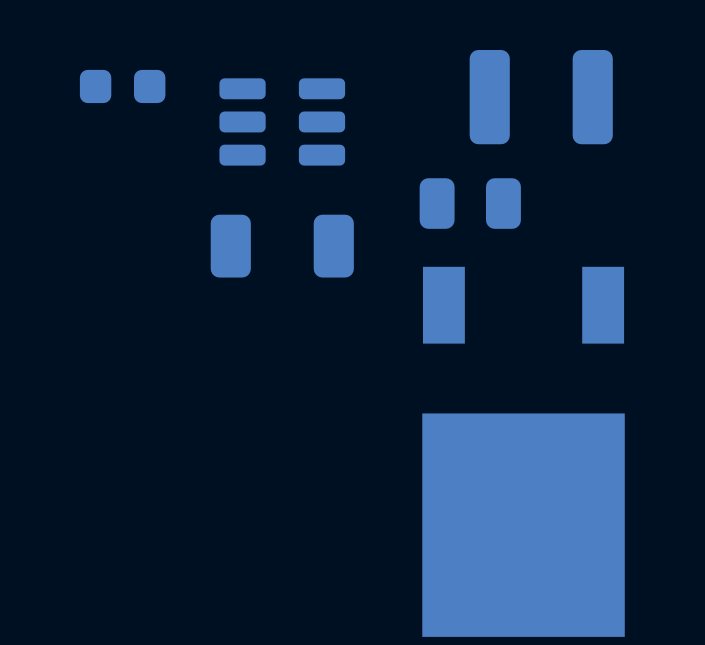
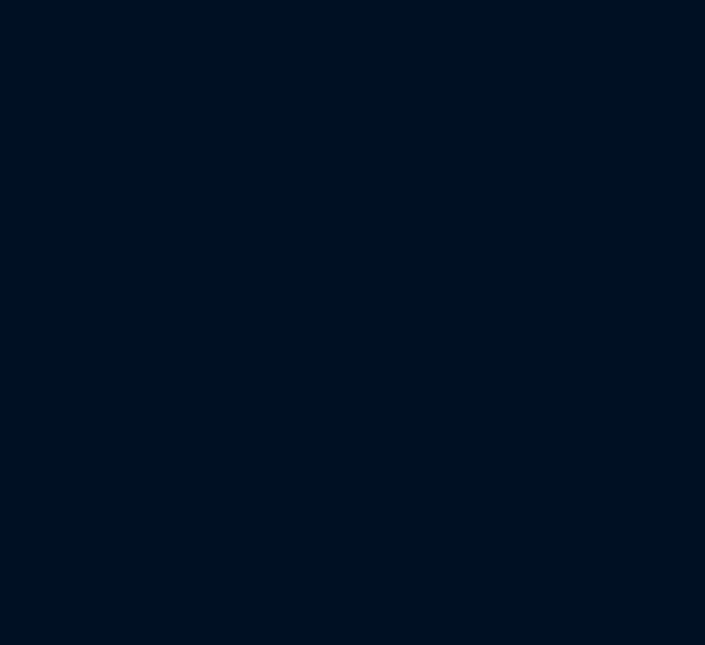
part: (122, 86) -> none
part: (541, 97) -> none
part: (282, 121) -> none
part: (470, 203) -> none
part: (282, 246) -> none
part: (523, 451) -> none

